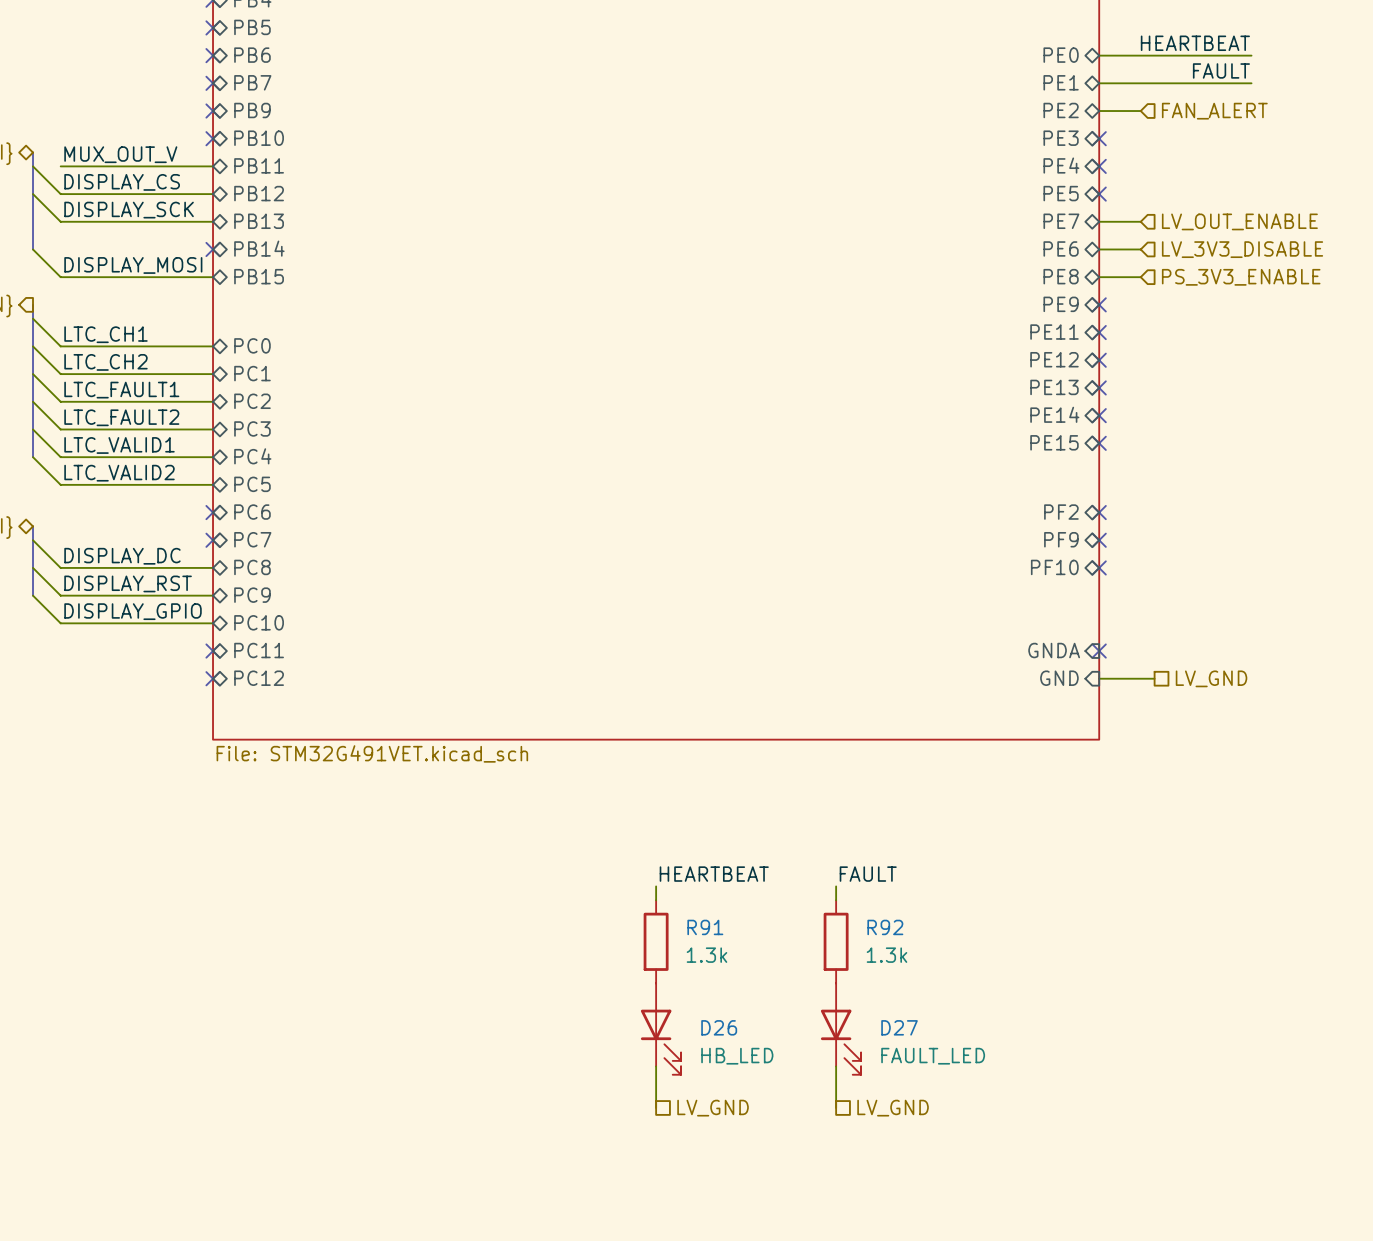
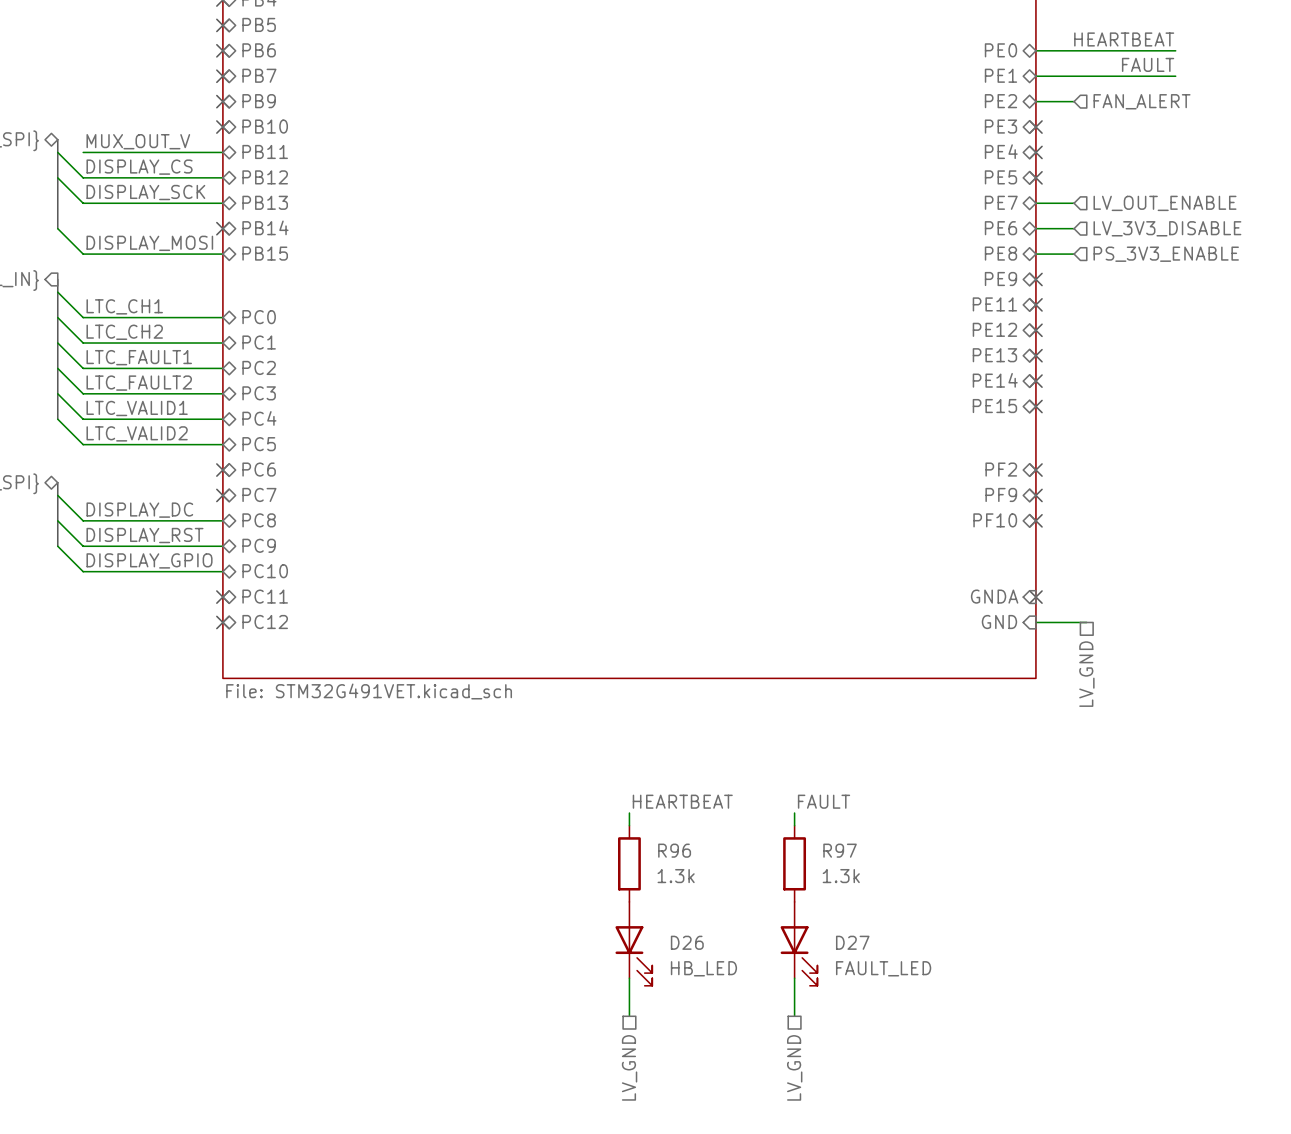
hierarchical label rotation: 0° (1211, 678) -> 90° clockwise (1086, 674)
R91 name: R91 (705, 927) -> R96 (674, 850)
R92 name: R92 (885, 927) -> R97 (840, 850)
hierarchical label rotation: 0° (713, 1108) -> 90° clockwise (629, 1067)
hierarchical label rotation: 0° (893, 1108) -> 90° clockwise (794, 1067)

